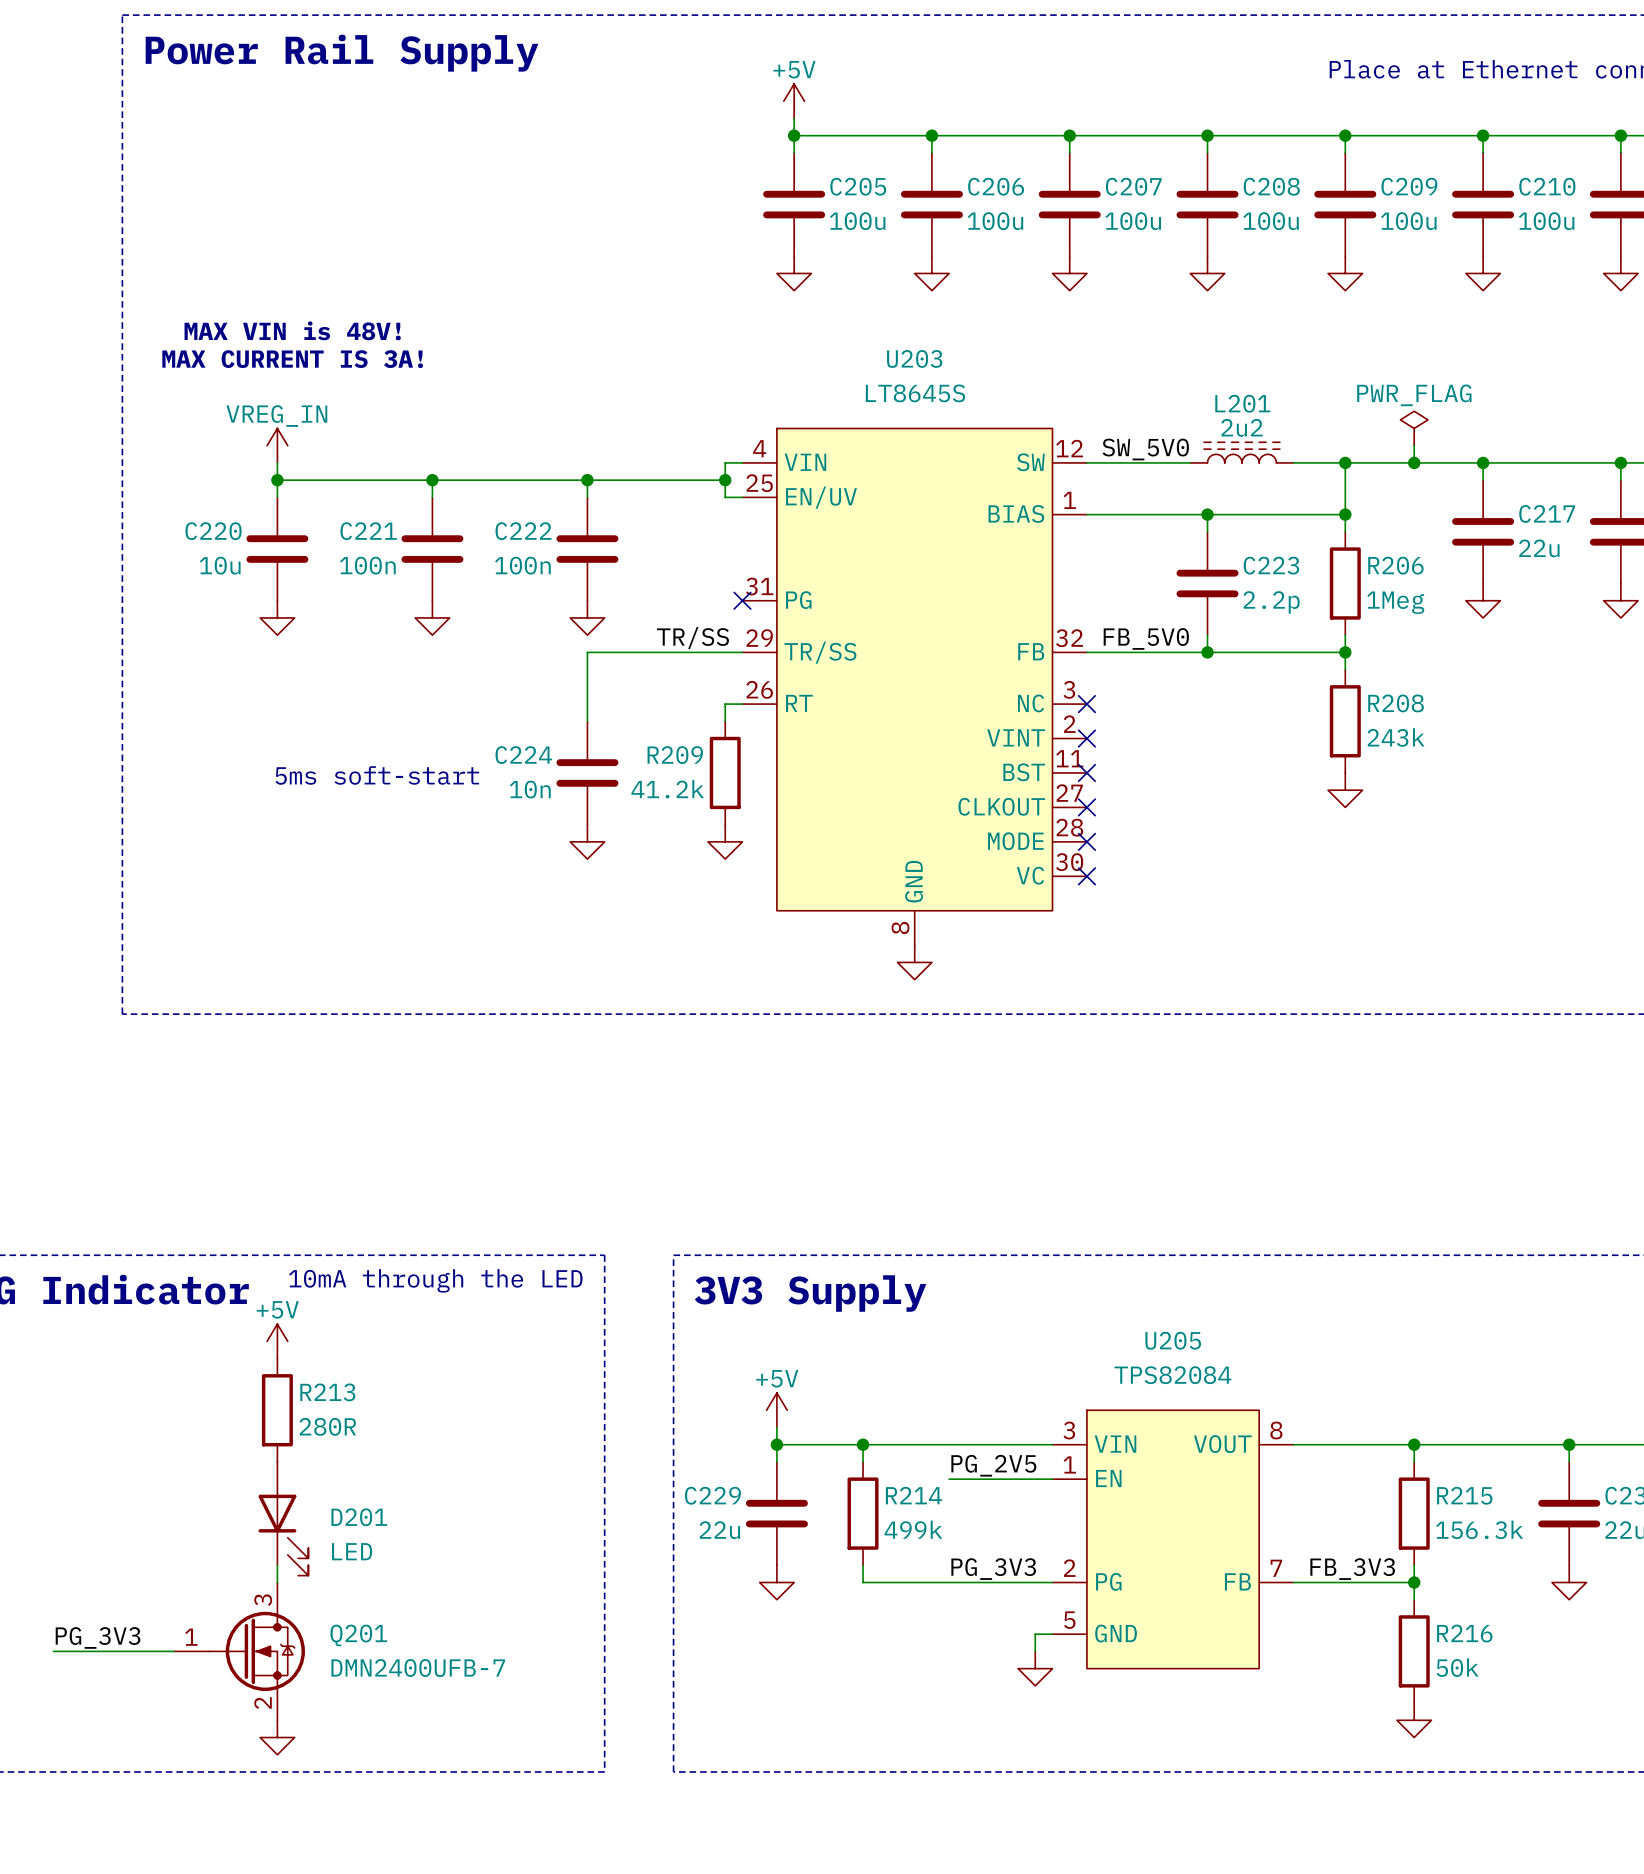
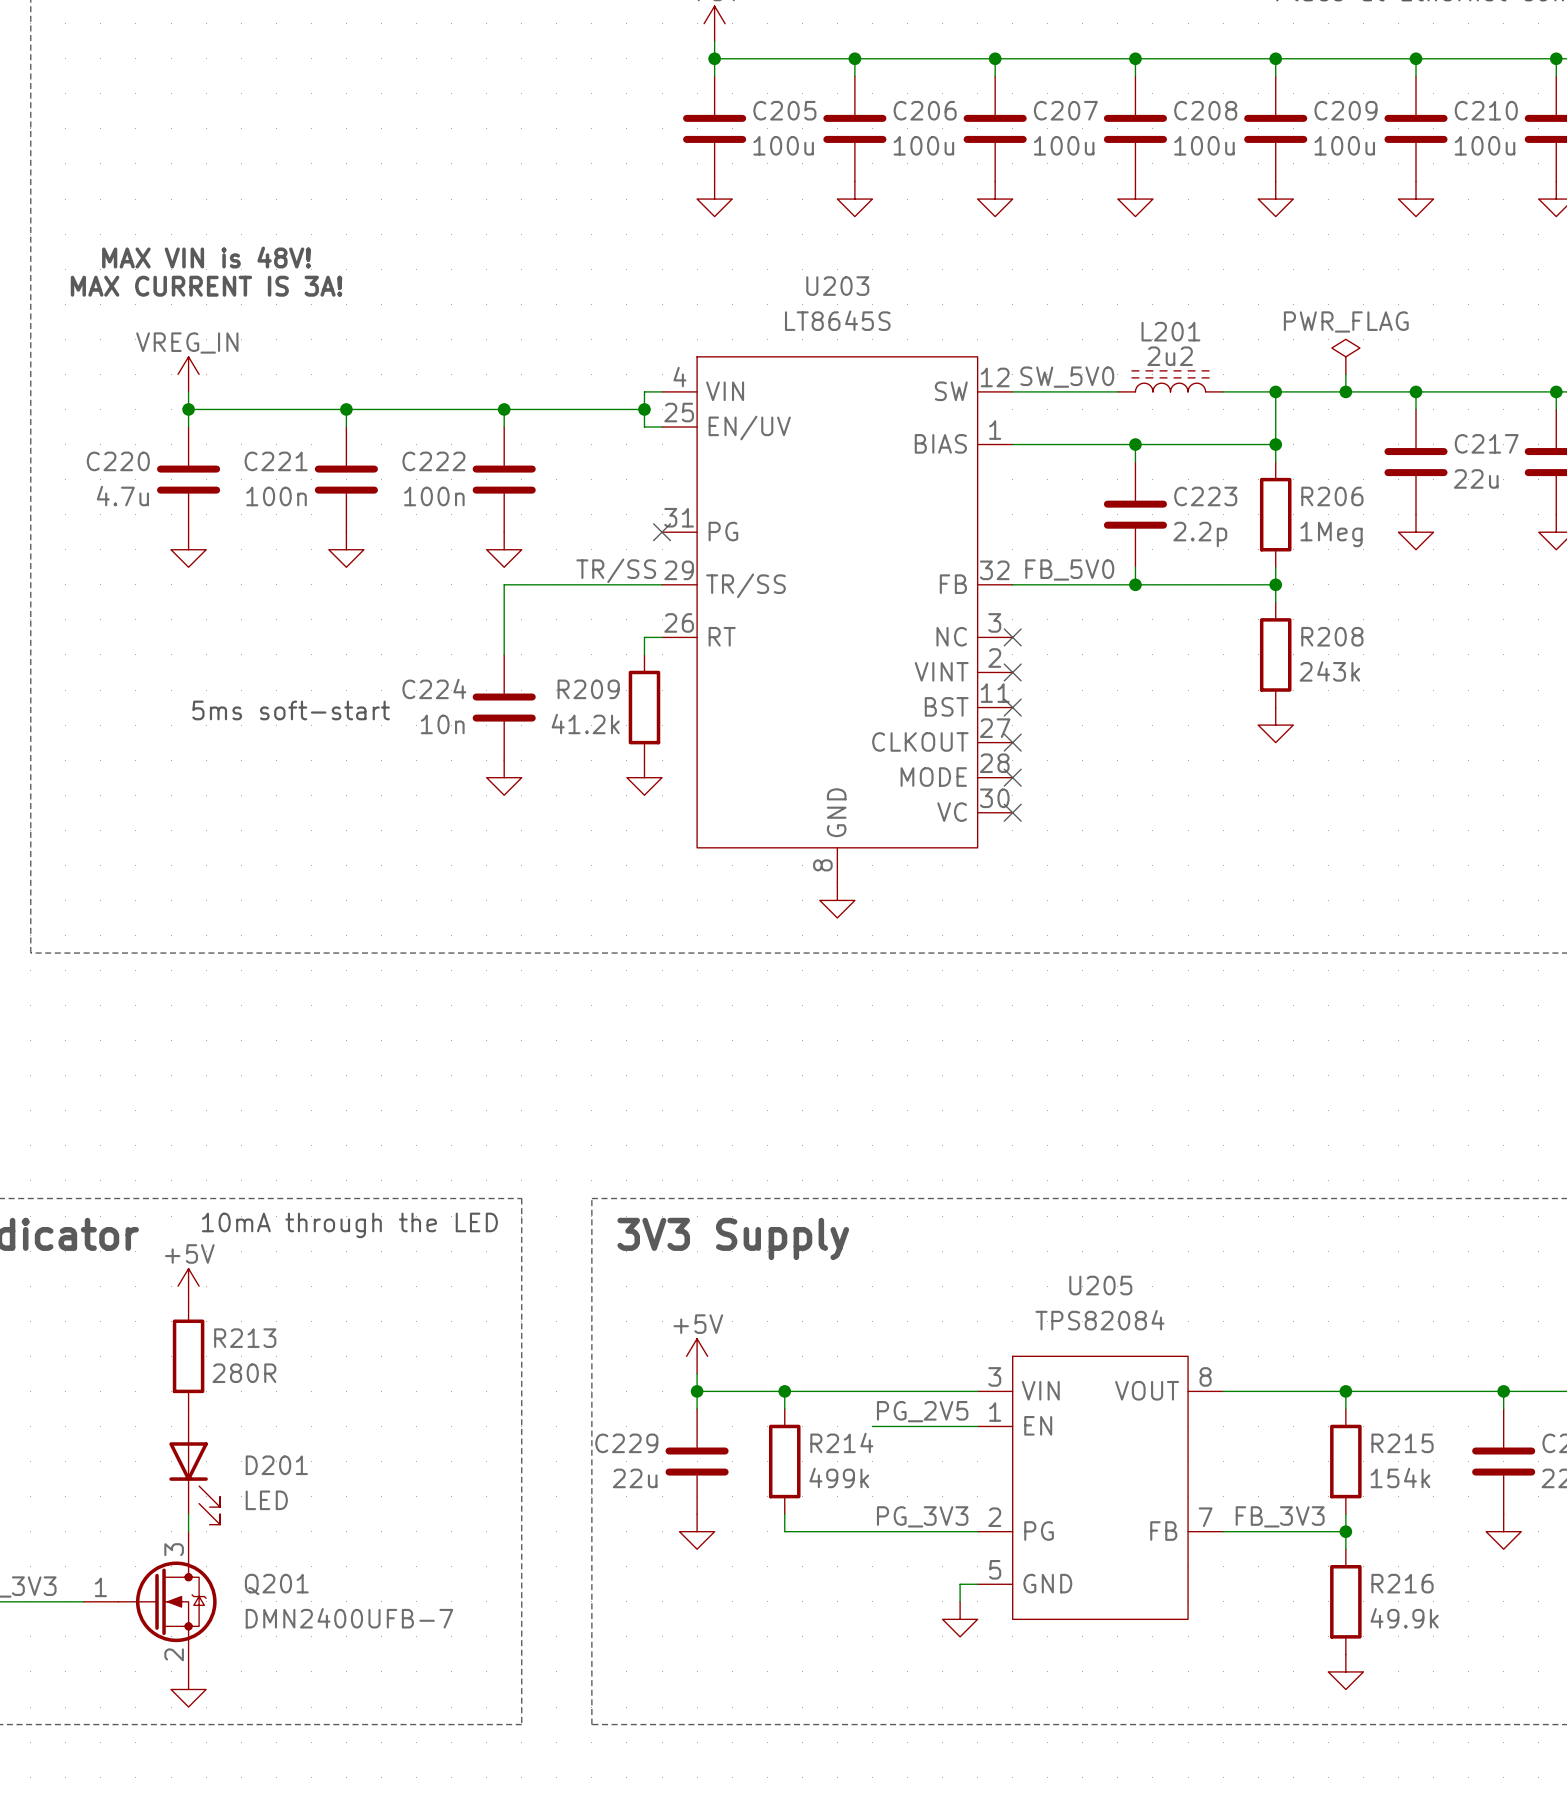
C220 value: 10u (220, 565) -> 4.7u (122, 496)
R215 value: 156.3k (1479, 1529) -> 154k (1400, 1478)
R216 value: 50k (1457, 1667) -> 49.9k (1404, 1618)

